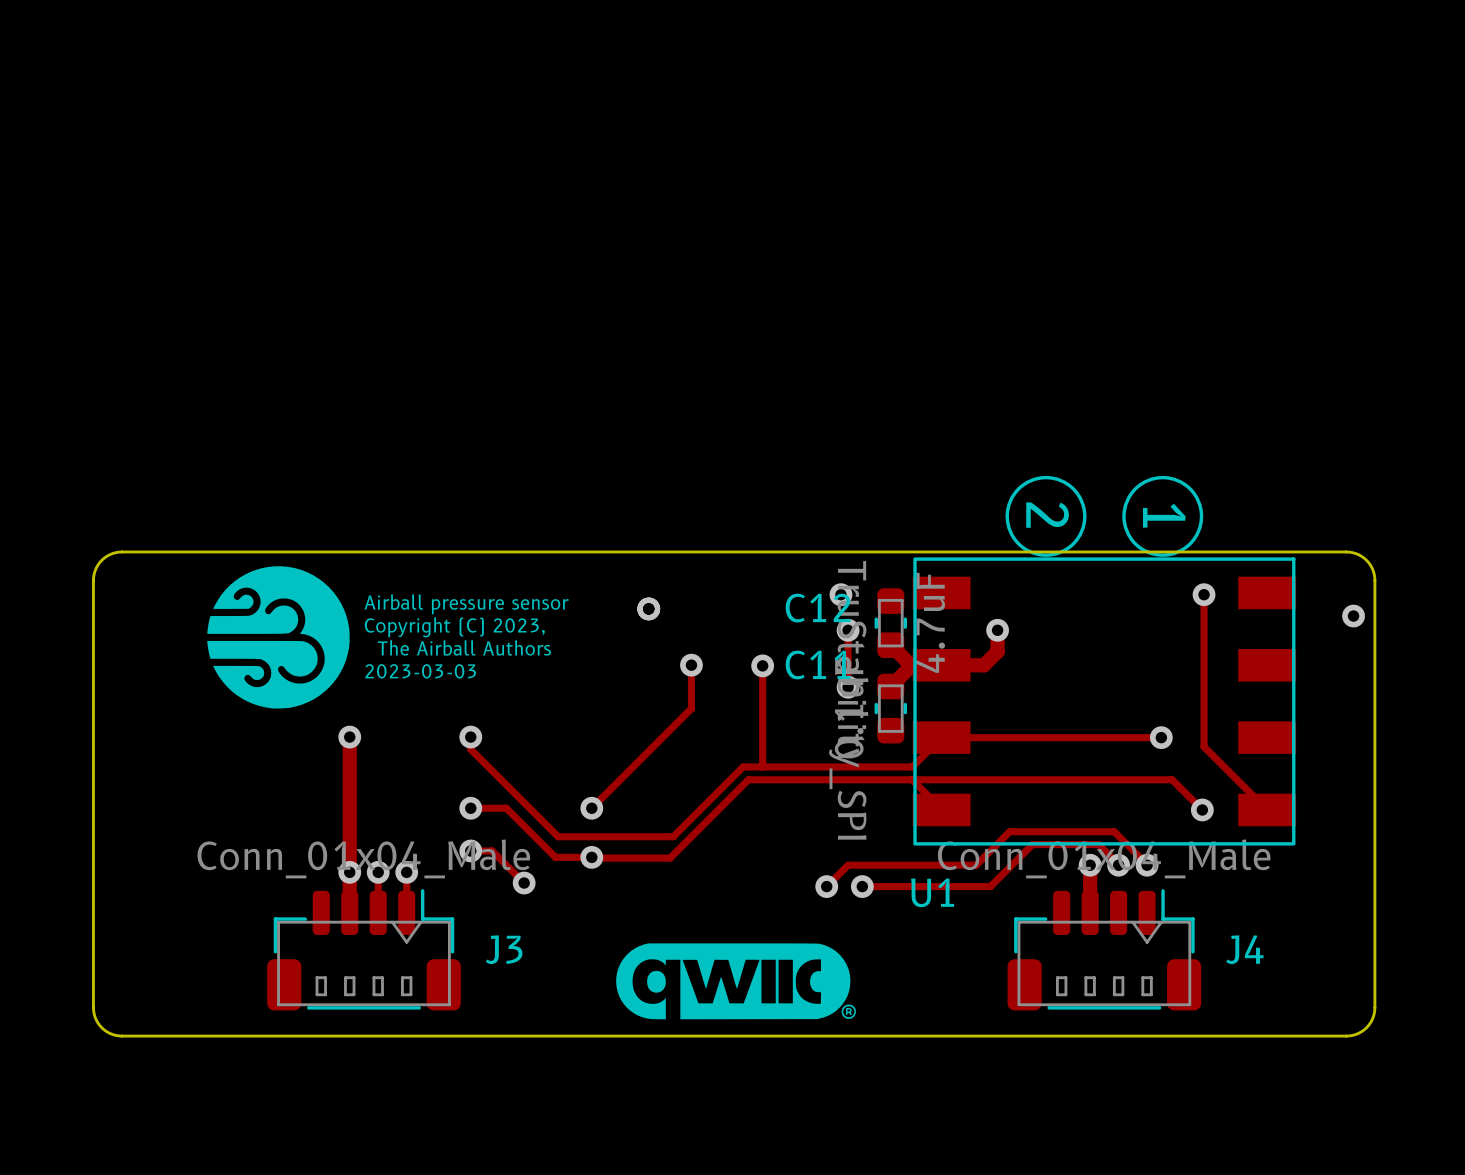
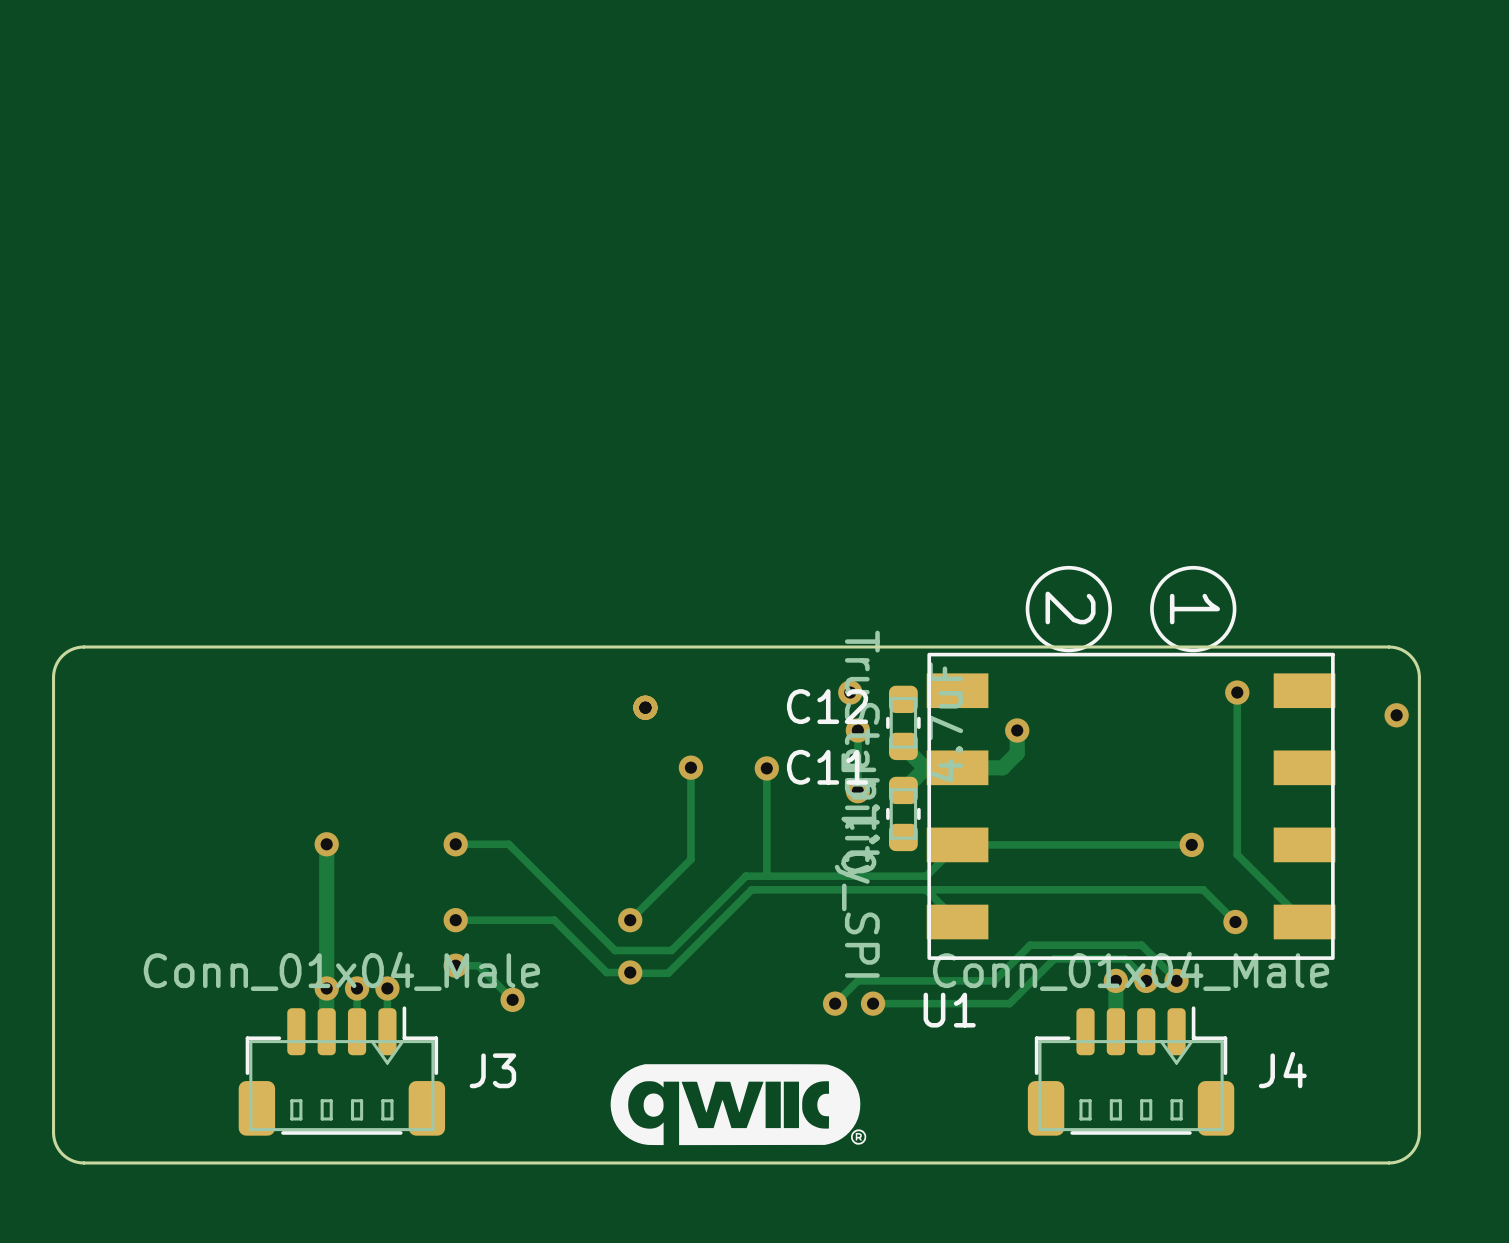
drawing: [207, 566, 350, 709] -> none
text: Airball pressure sensor (466, 604) -> none
text: Copyright (C) 2023, (454, 627) -> none
text: The Airball Authors (464, 647) -> none
text: 2023-03-03 (420, 671) -> none
track: (691, 708) (591, 808) -> (690, 813) (690, 859) (630, 920)
track: (470, 737) (470, 749) (558, 836) (620, 836) -> (455, 844) (508, 844) (615, 950)
track: (506, 808) (555, 857) (635, 858) -> (493, 920) (554, 920) (606, 972) (631, 973)
via: (591, 808) -> none
via: none -> (630, 920)
via: (591, 857) -> none
via: none -> (630, 972)

